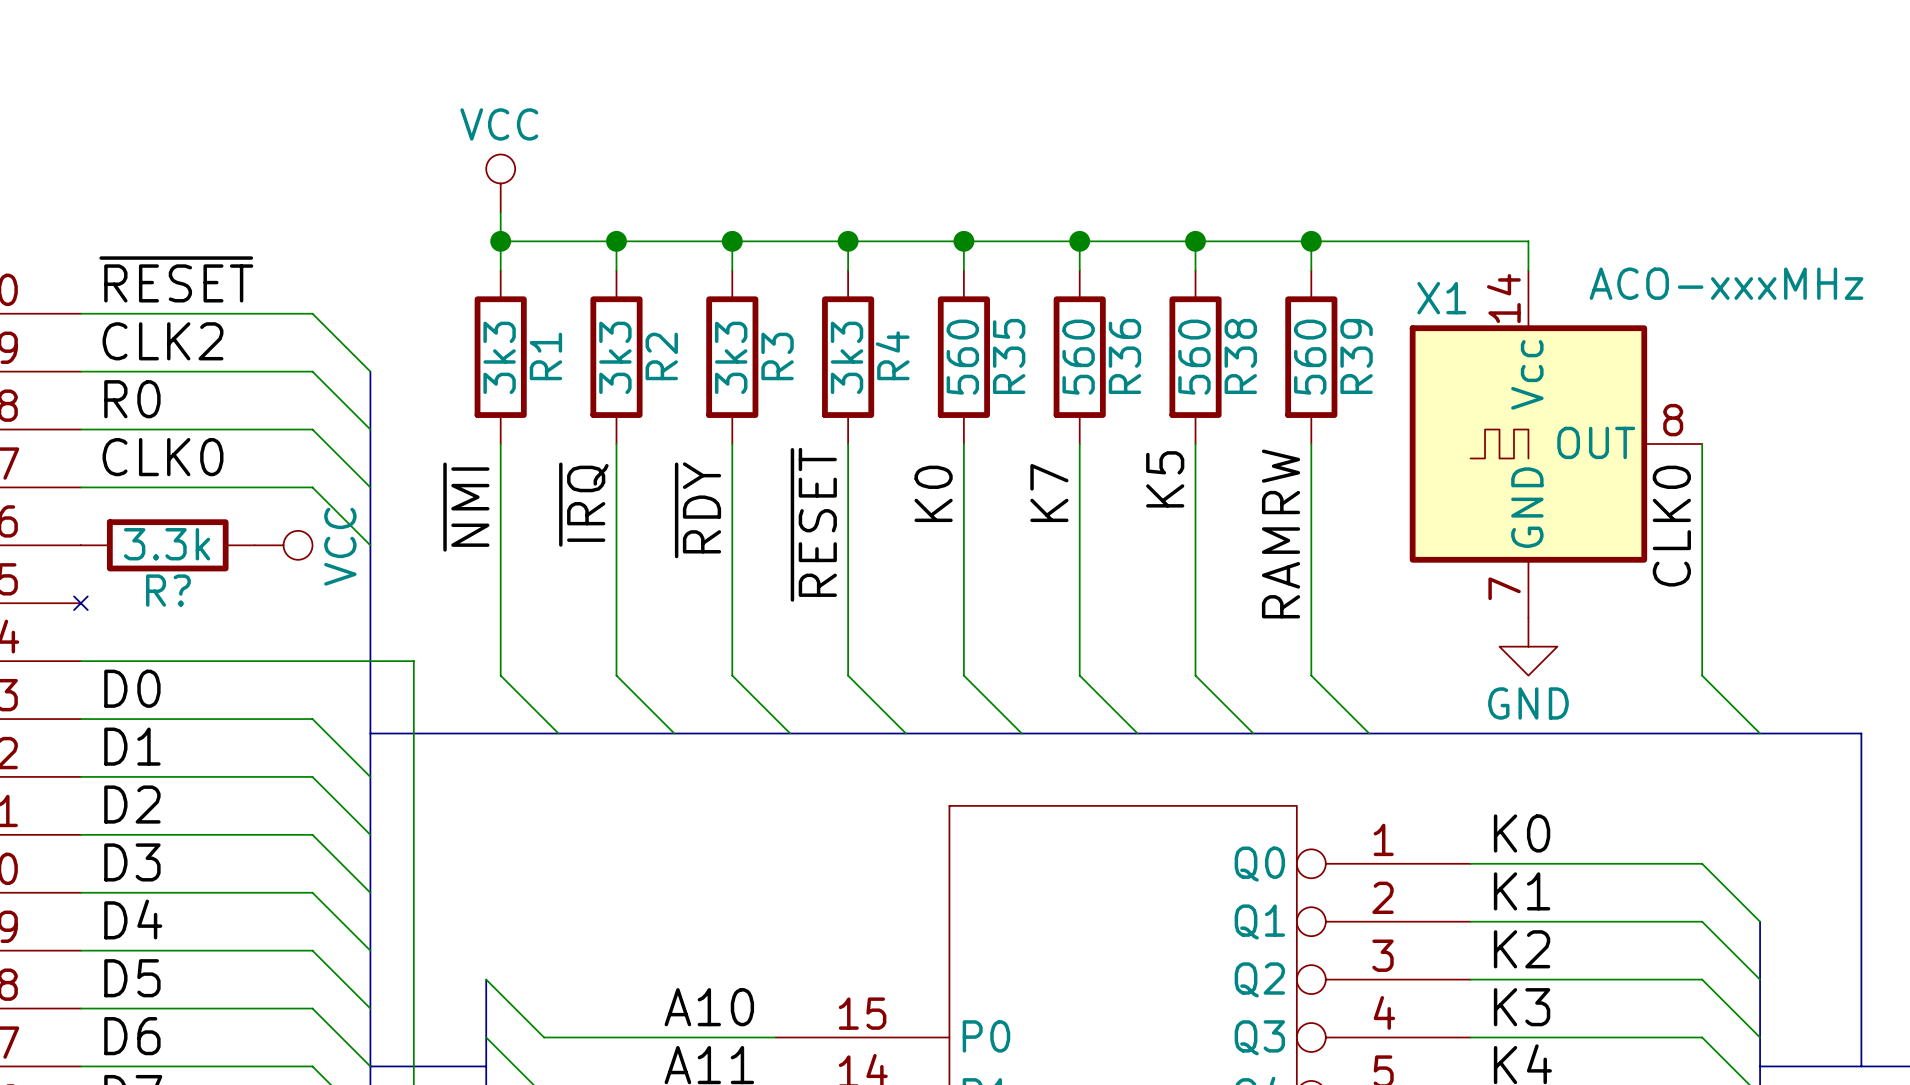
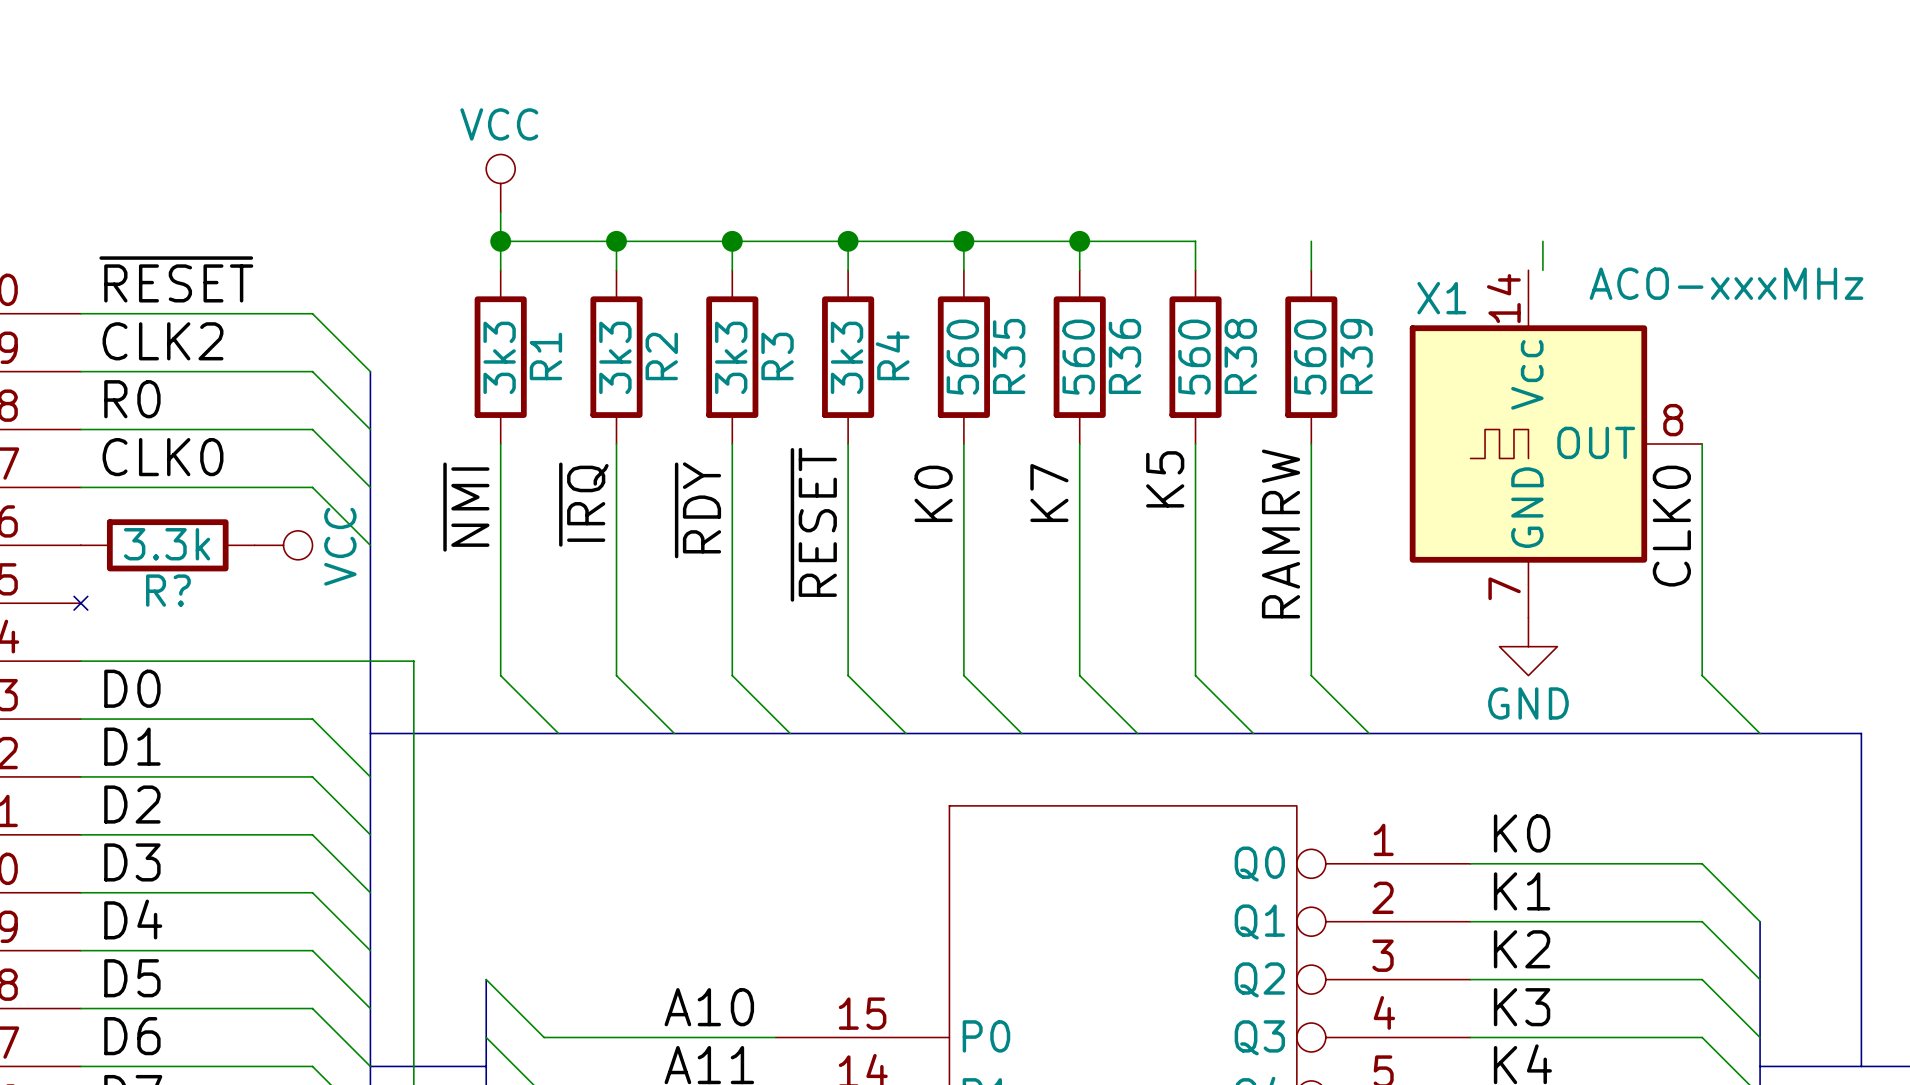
wire: (1195, 241) (1528, 241) (1528, 270) -> none
junction: (1195, 241) -> none
junction: (1311, 241) -> none
wire: none -> (1542, 241) (1542, 270)

